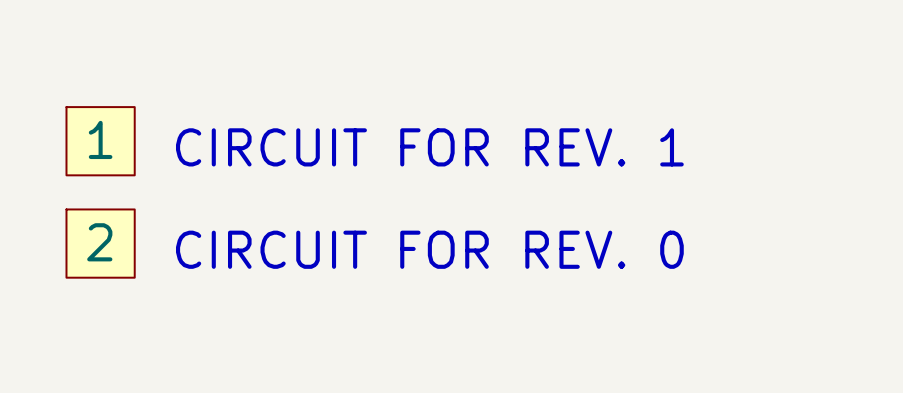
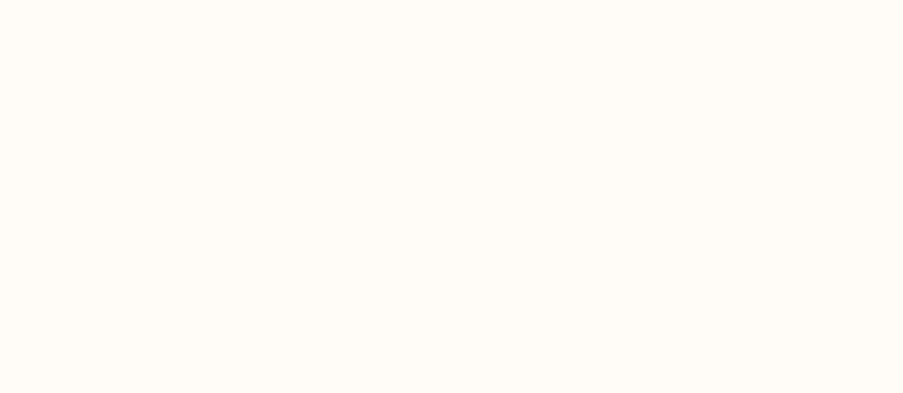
part: 1 (100, 141) -> none
text: CIRCUIT FOR REV. 1 (429, 147) -> none
part: 2 (100, 243) -> none
text: CIRCUIT FOR REV. 0 (429, 249) -> none

